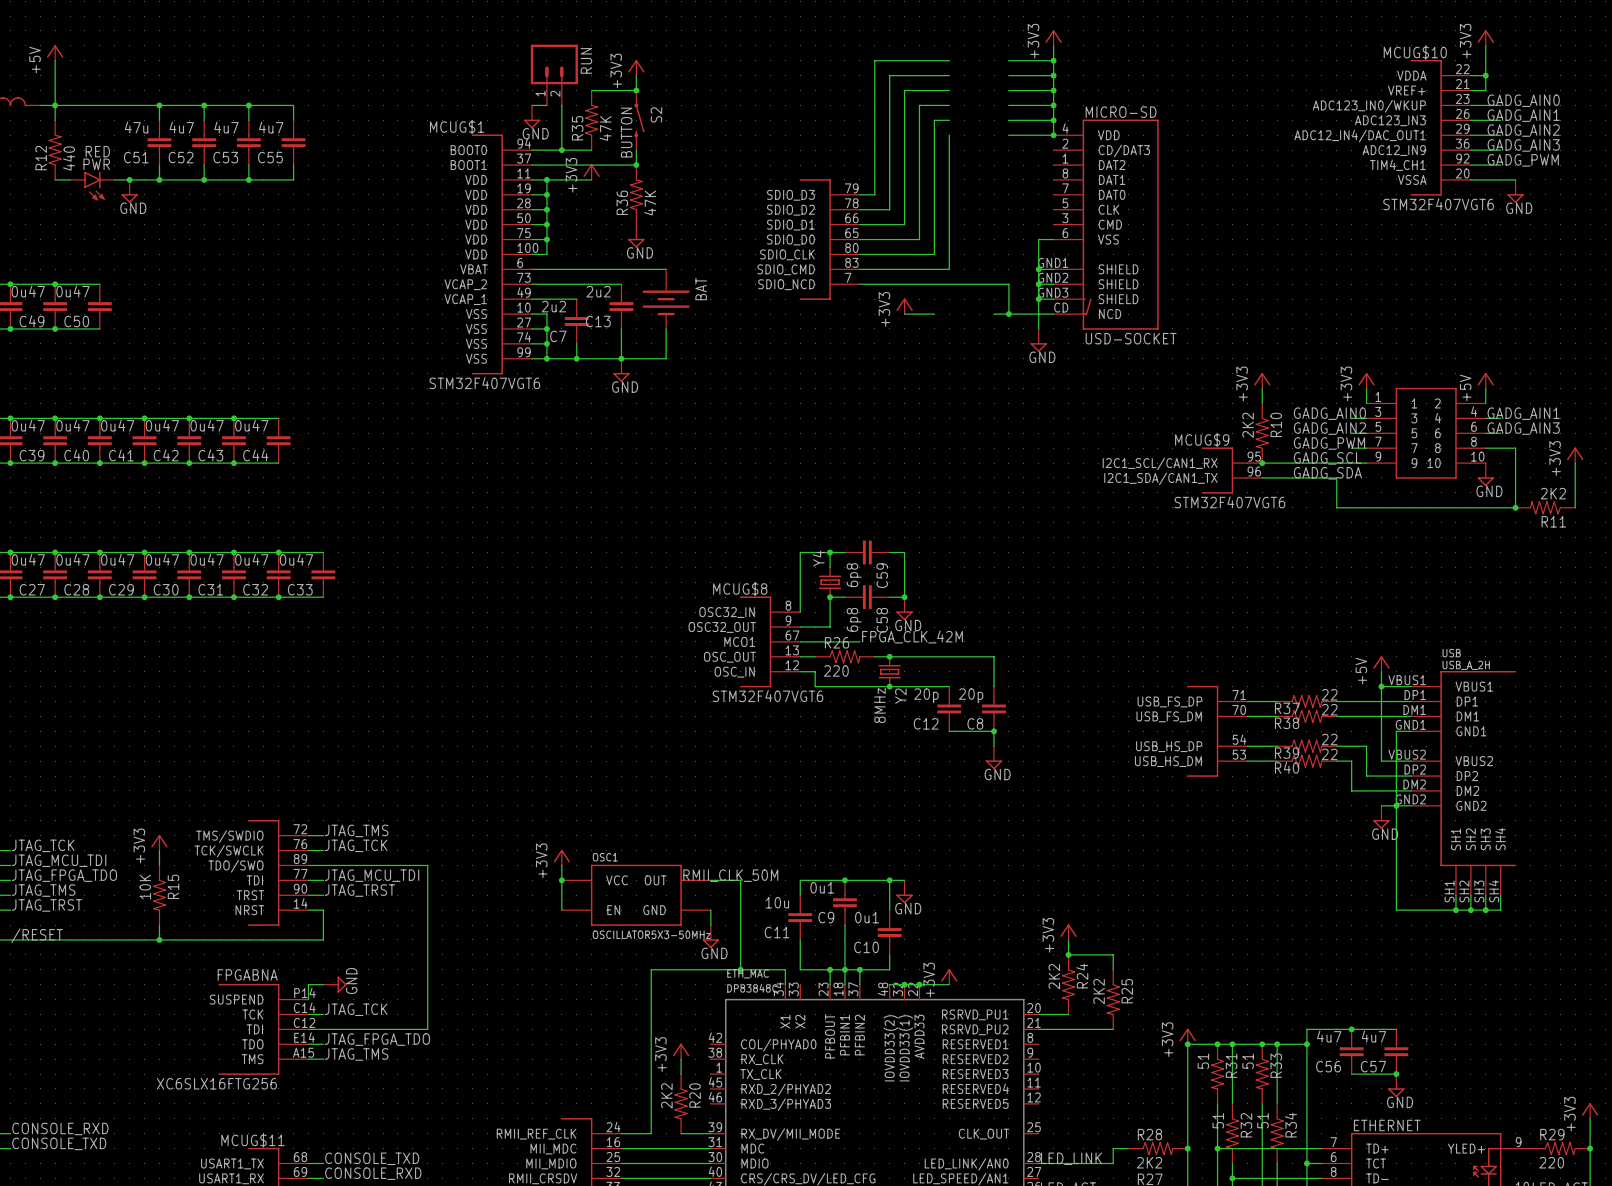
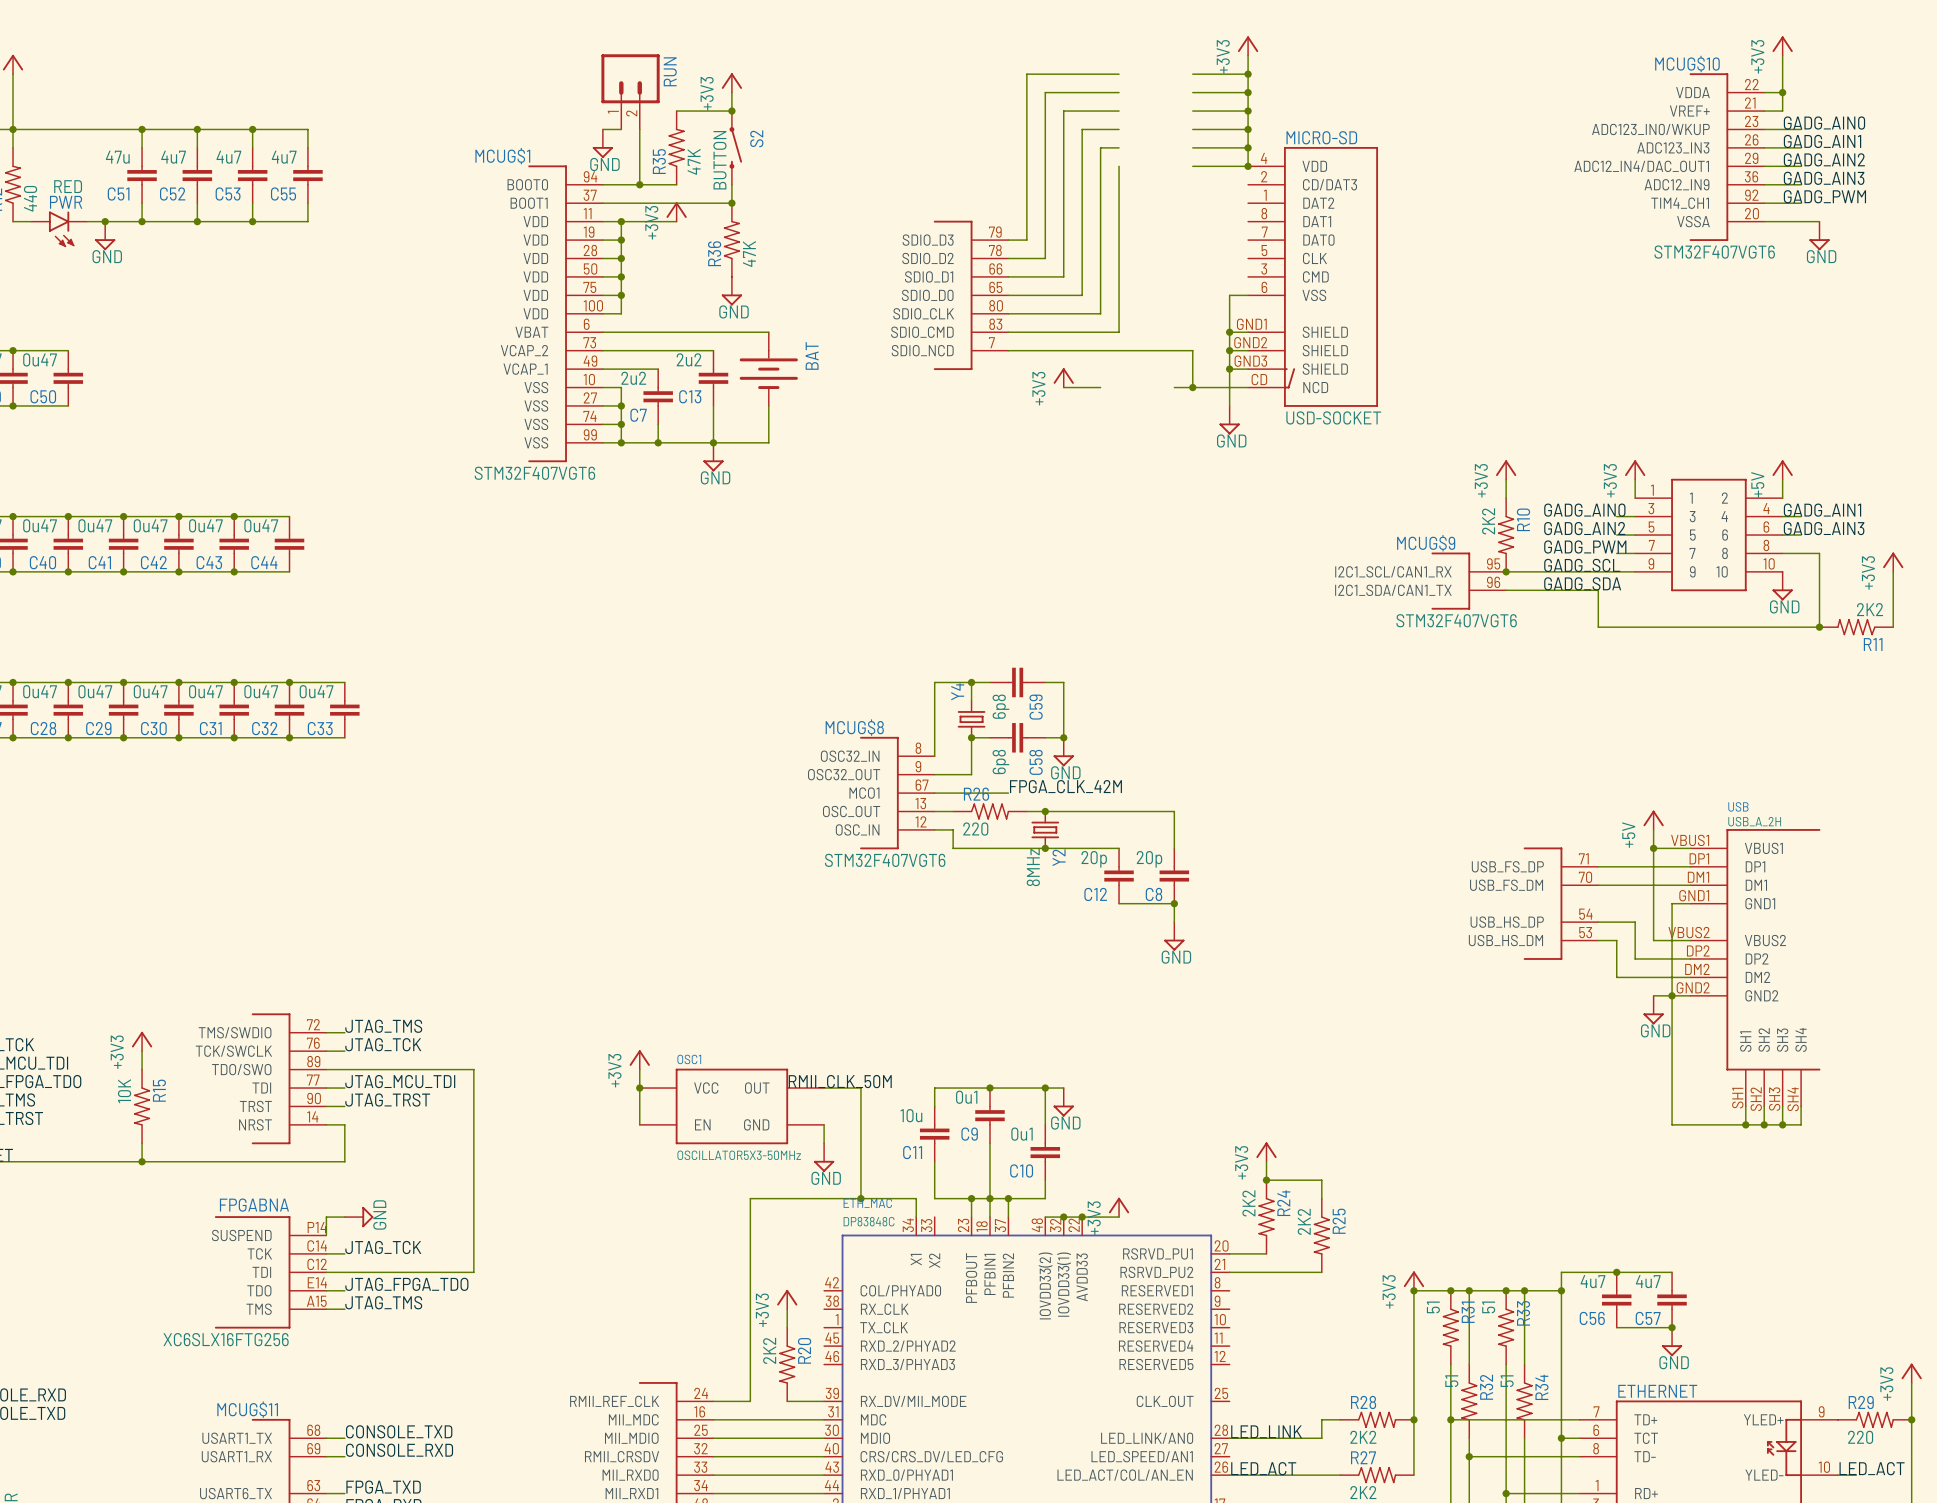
wire: (1247, 701) (1277, 701) -> none
R37: 22 (1306, 701) -> none
wire: (1247, 716) (1277, 716) -> none
R38: 22 (1306, 716) -> none
part position: (1217, 731) -> (1560, 903)
wire: (1247, 746) (1277, 746) -> none
R39: 22 (1306, 746) -> none
wire: (1247, 761) (1277, 761) -> none
R40: 22 (1306, 761) -> none

